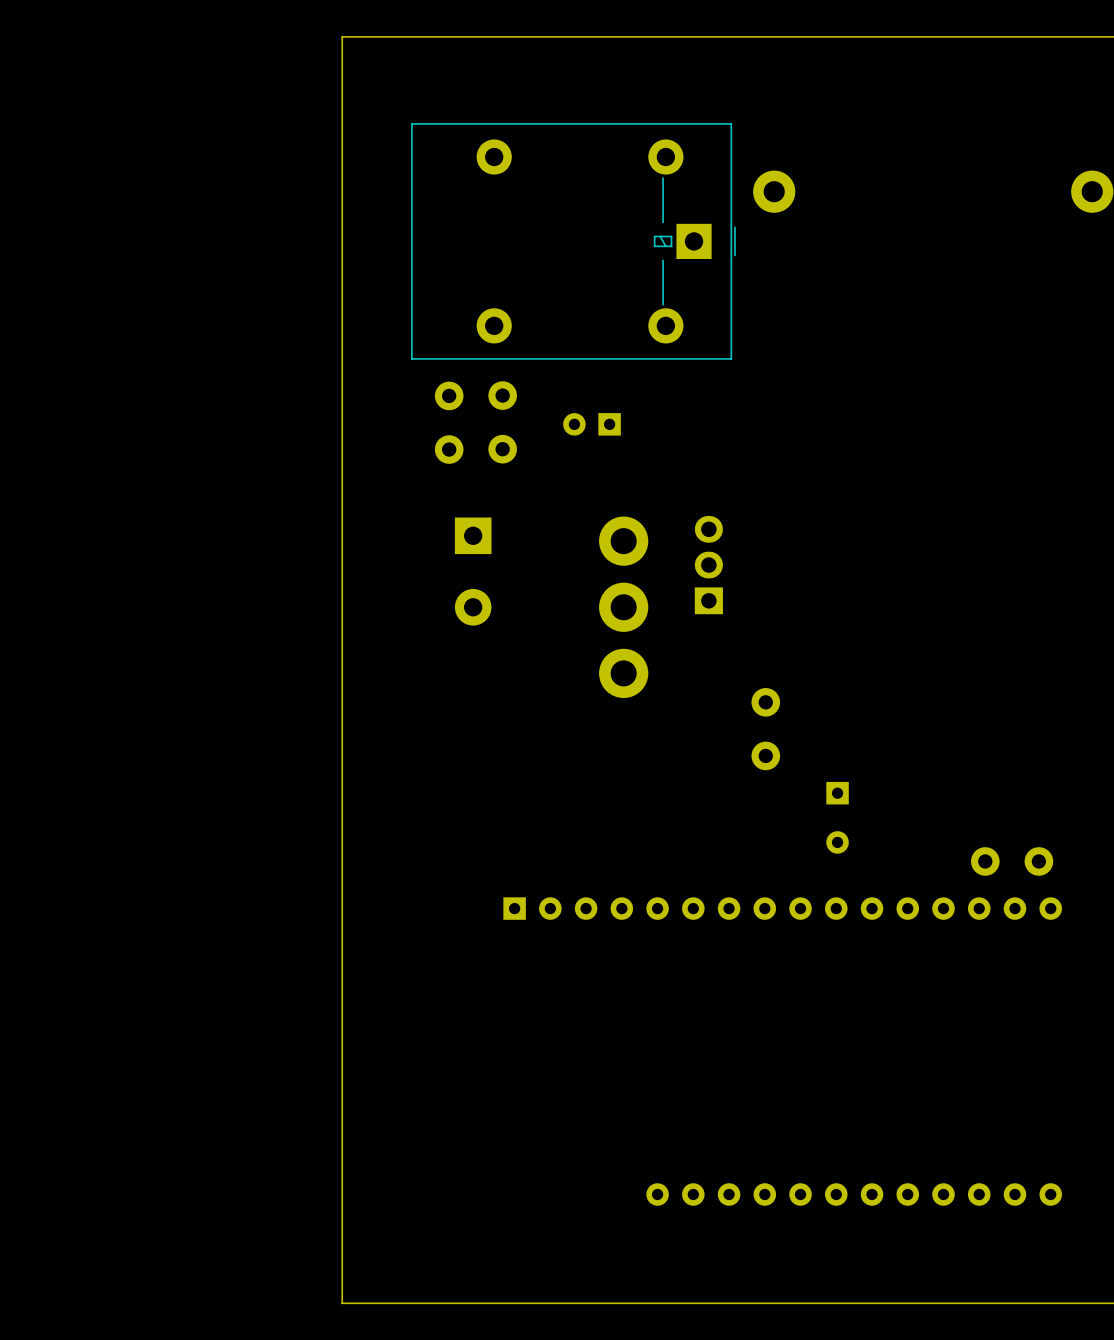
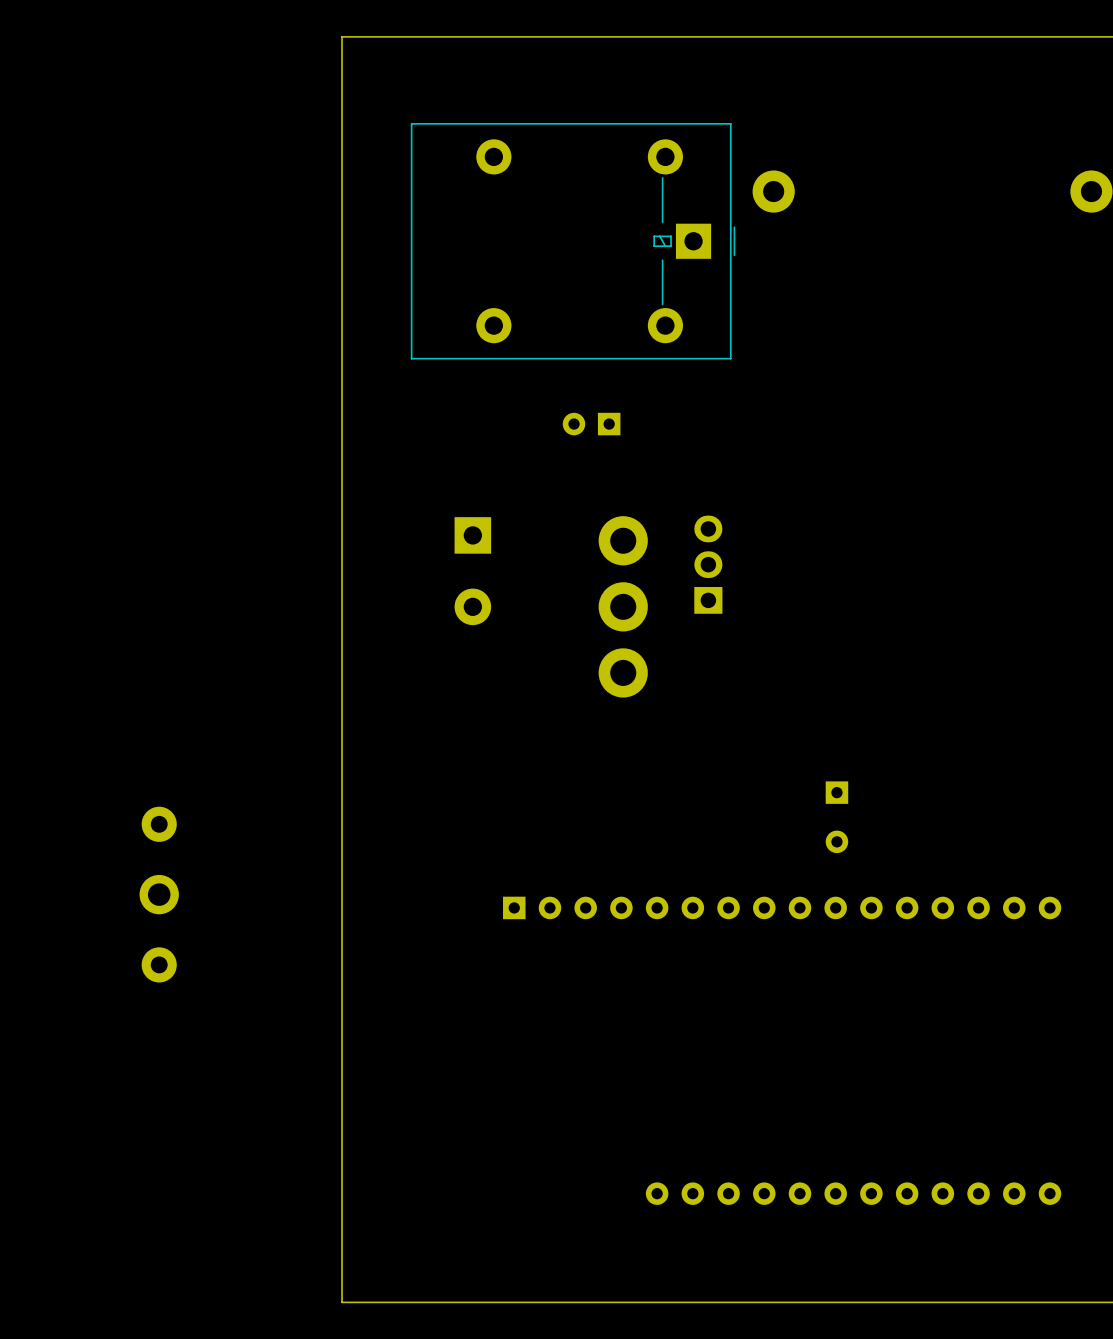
part: (449, 422) -> none
part: (502, 422) -> none
part: (765, 729) -> none
part: (1012, 861) -> none
part: none -> (159, 894)

